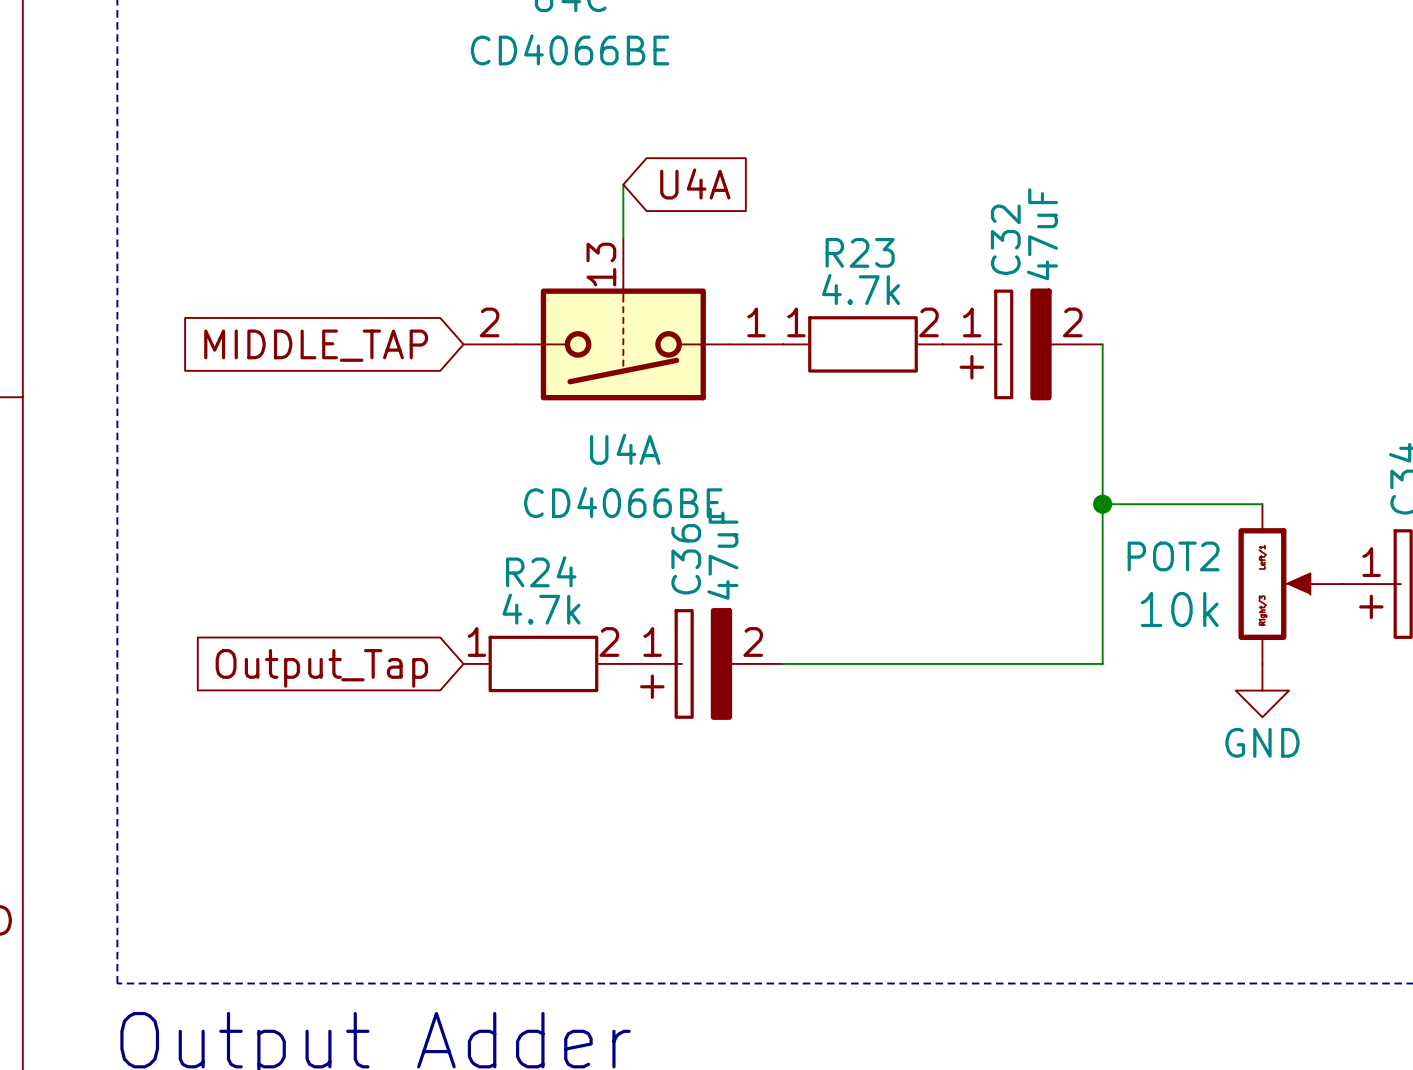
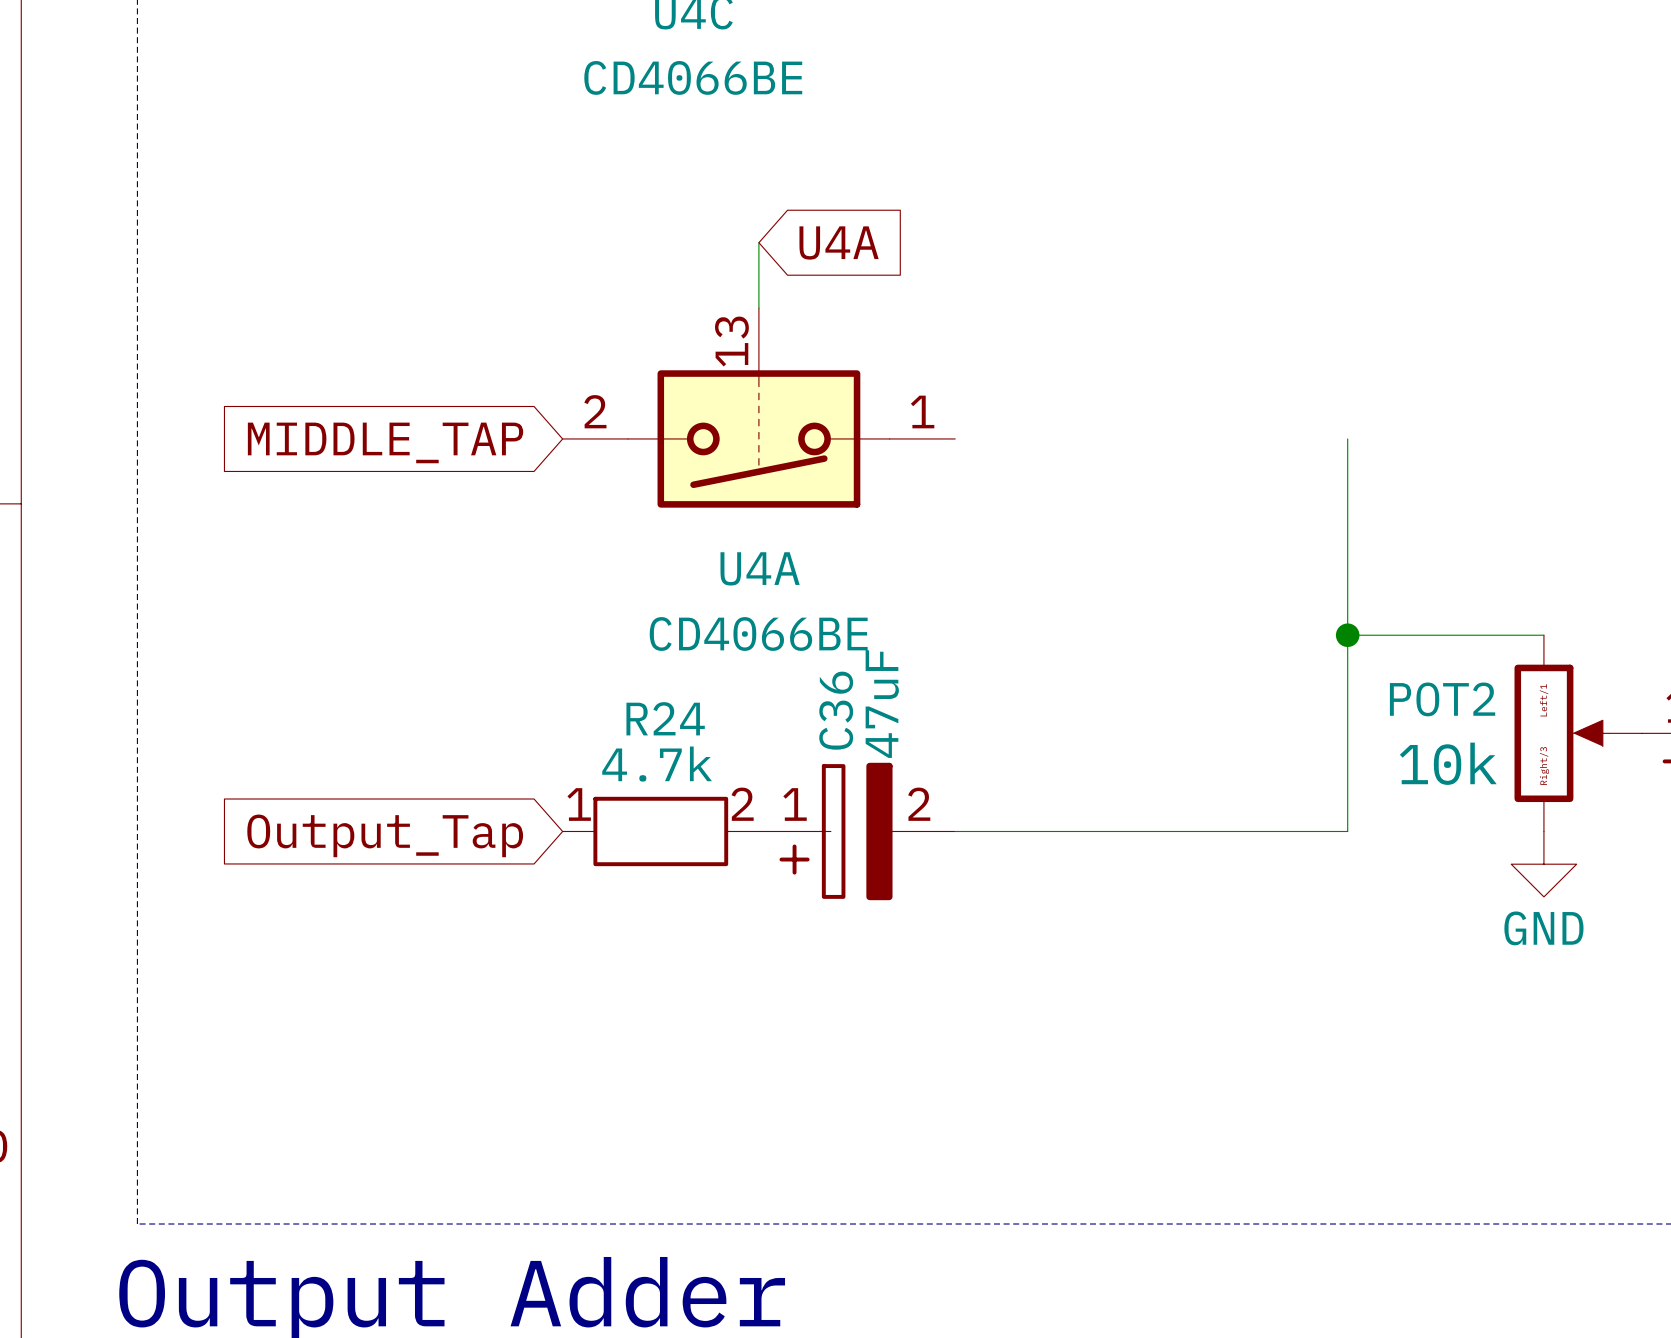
R23: 4.7k (863, 344) -> none
C32: 47uF (1022, 344) -> none

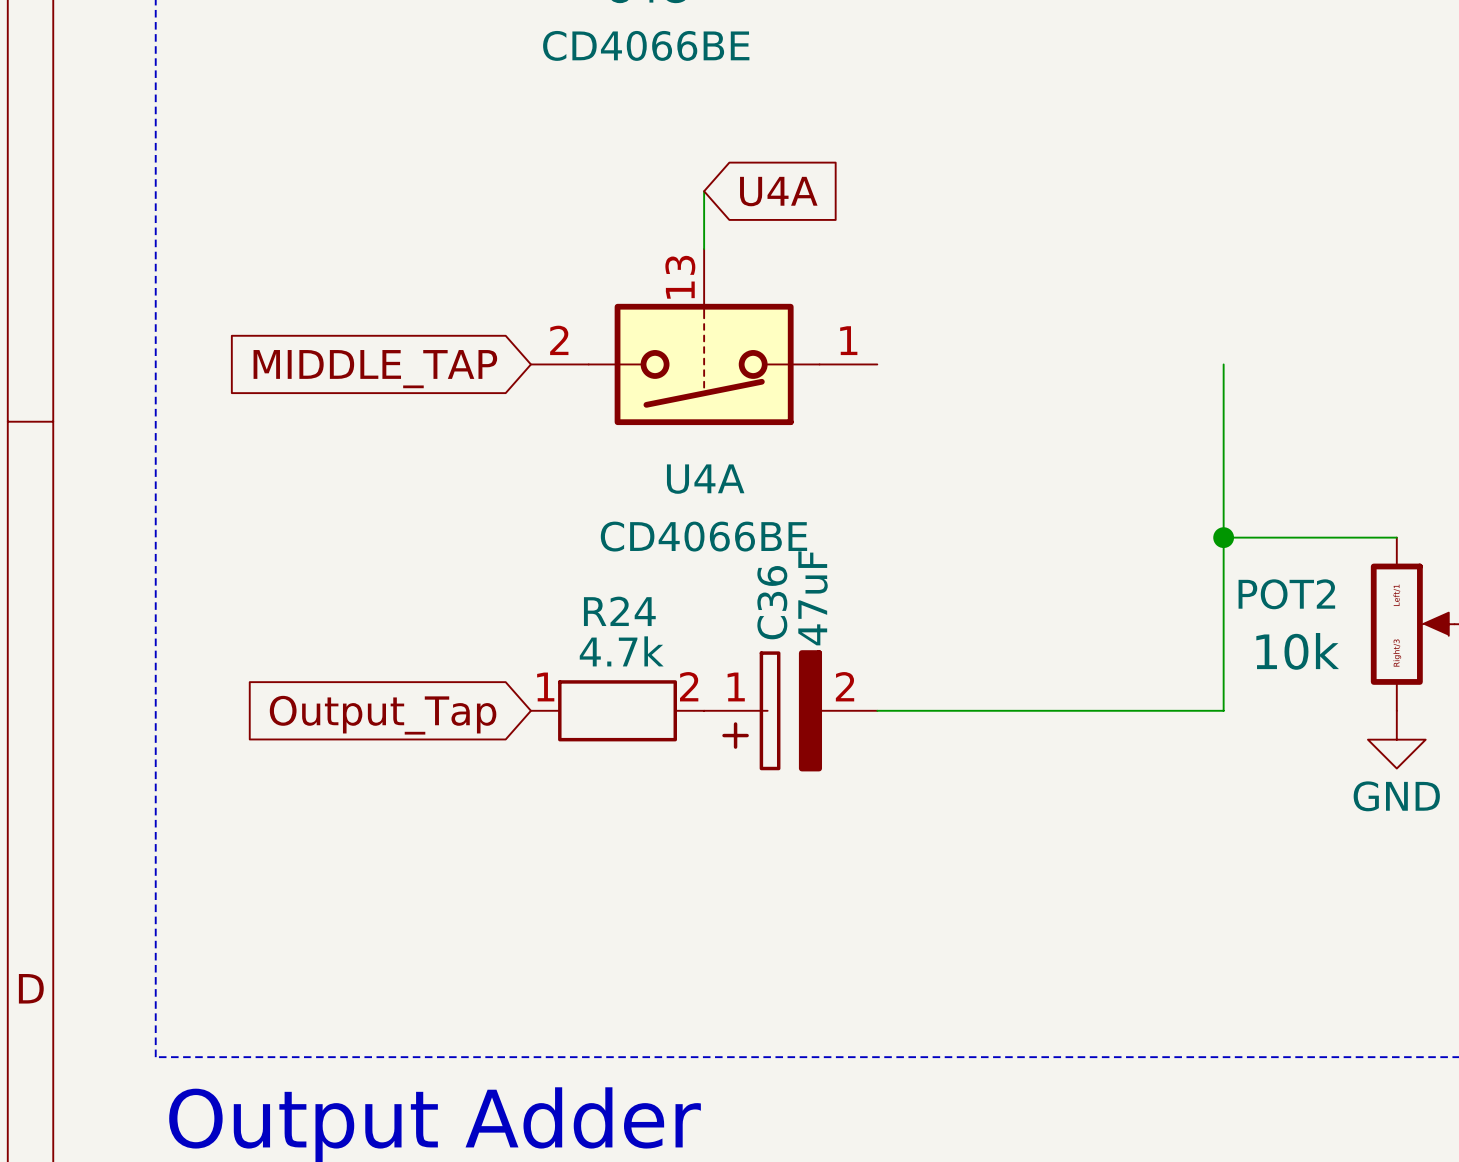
POT2 name position: POT2 (1442, 699) -> POT2 (1286, 594)
POT2 text position: 10k (1448, 763) -> 10k (1297, 651)

